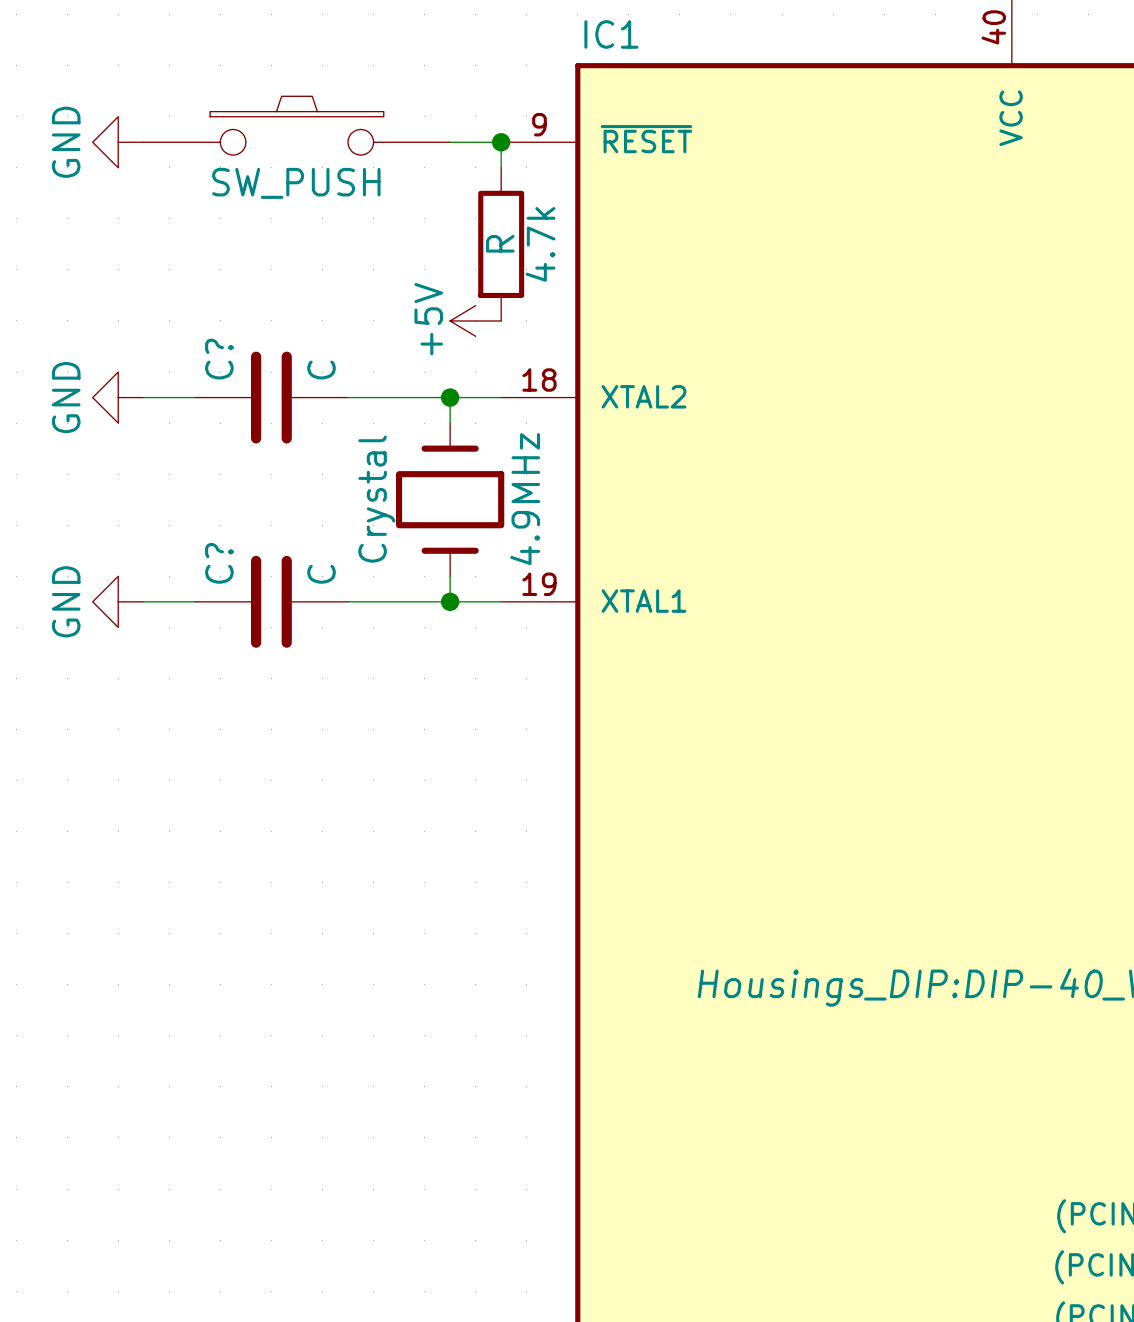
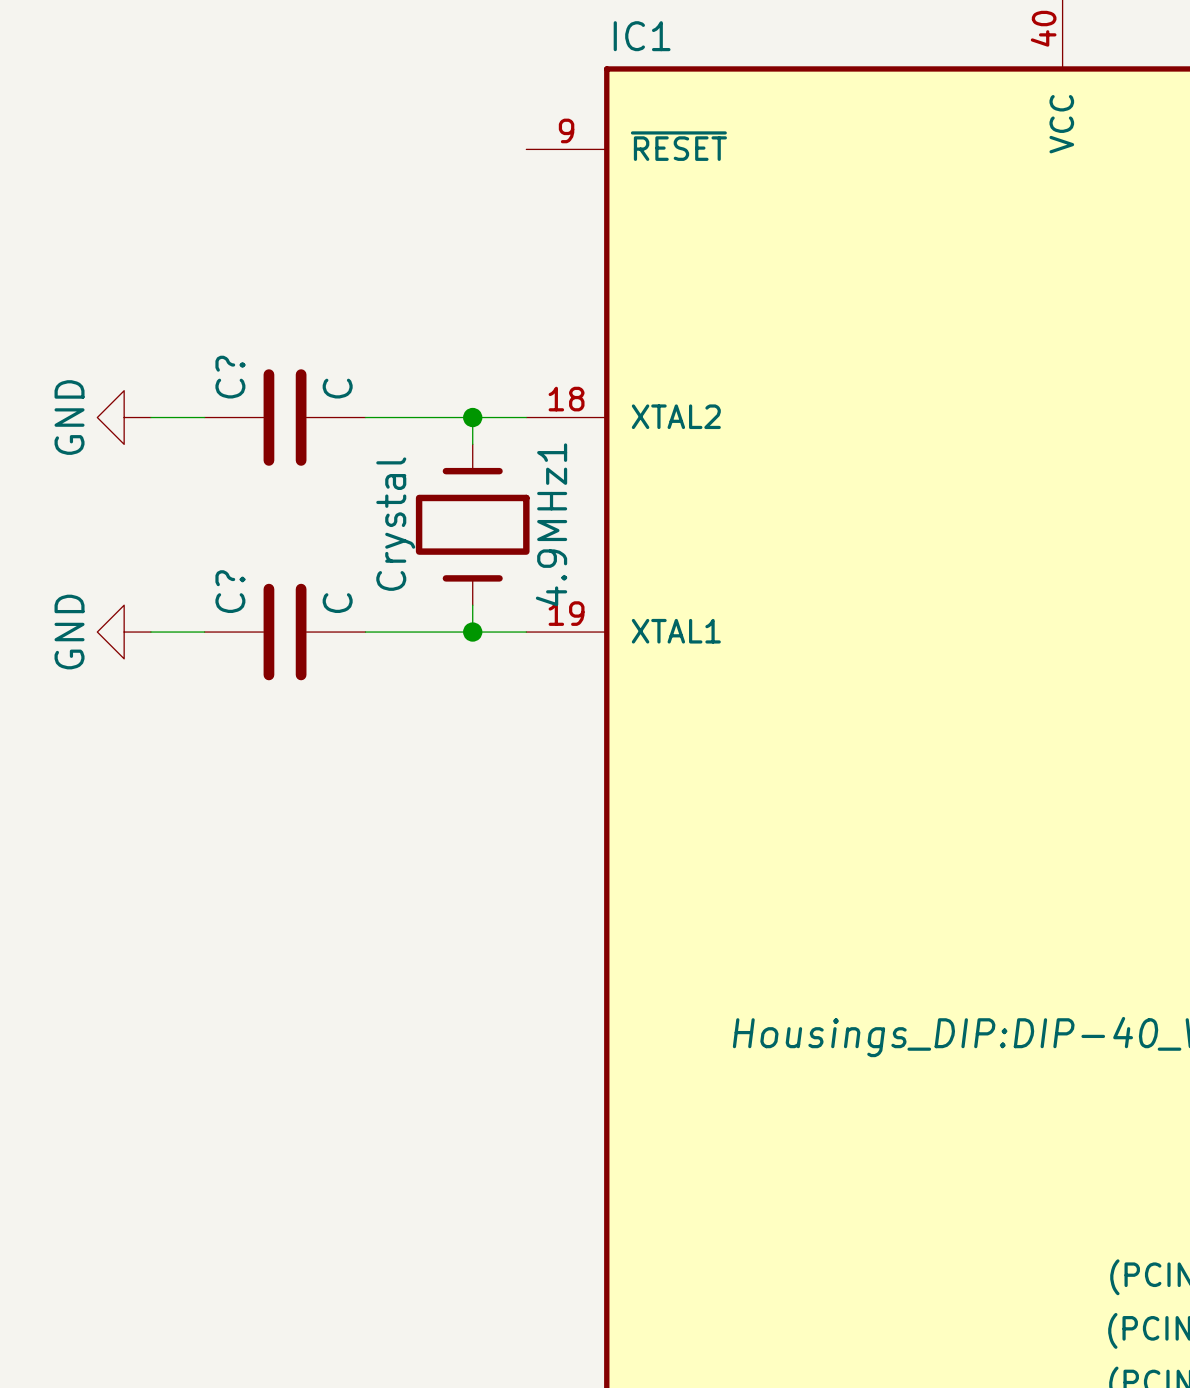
part: SW_PUSH (296, 125) -> none
power symbol: GND (118, 142) -> none
wire: (450, 142) (501, 142) (501, 167) -> none
junction: (501, 142) -> none
4.7k: R (501, 244) -> none
power symbol: +5V (475, 320) -> none
4.9MHz name: 4.9MHz (525, 499) -> 4.9MHz1 (551, 524)

